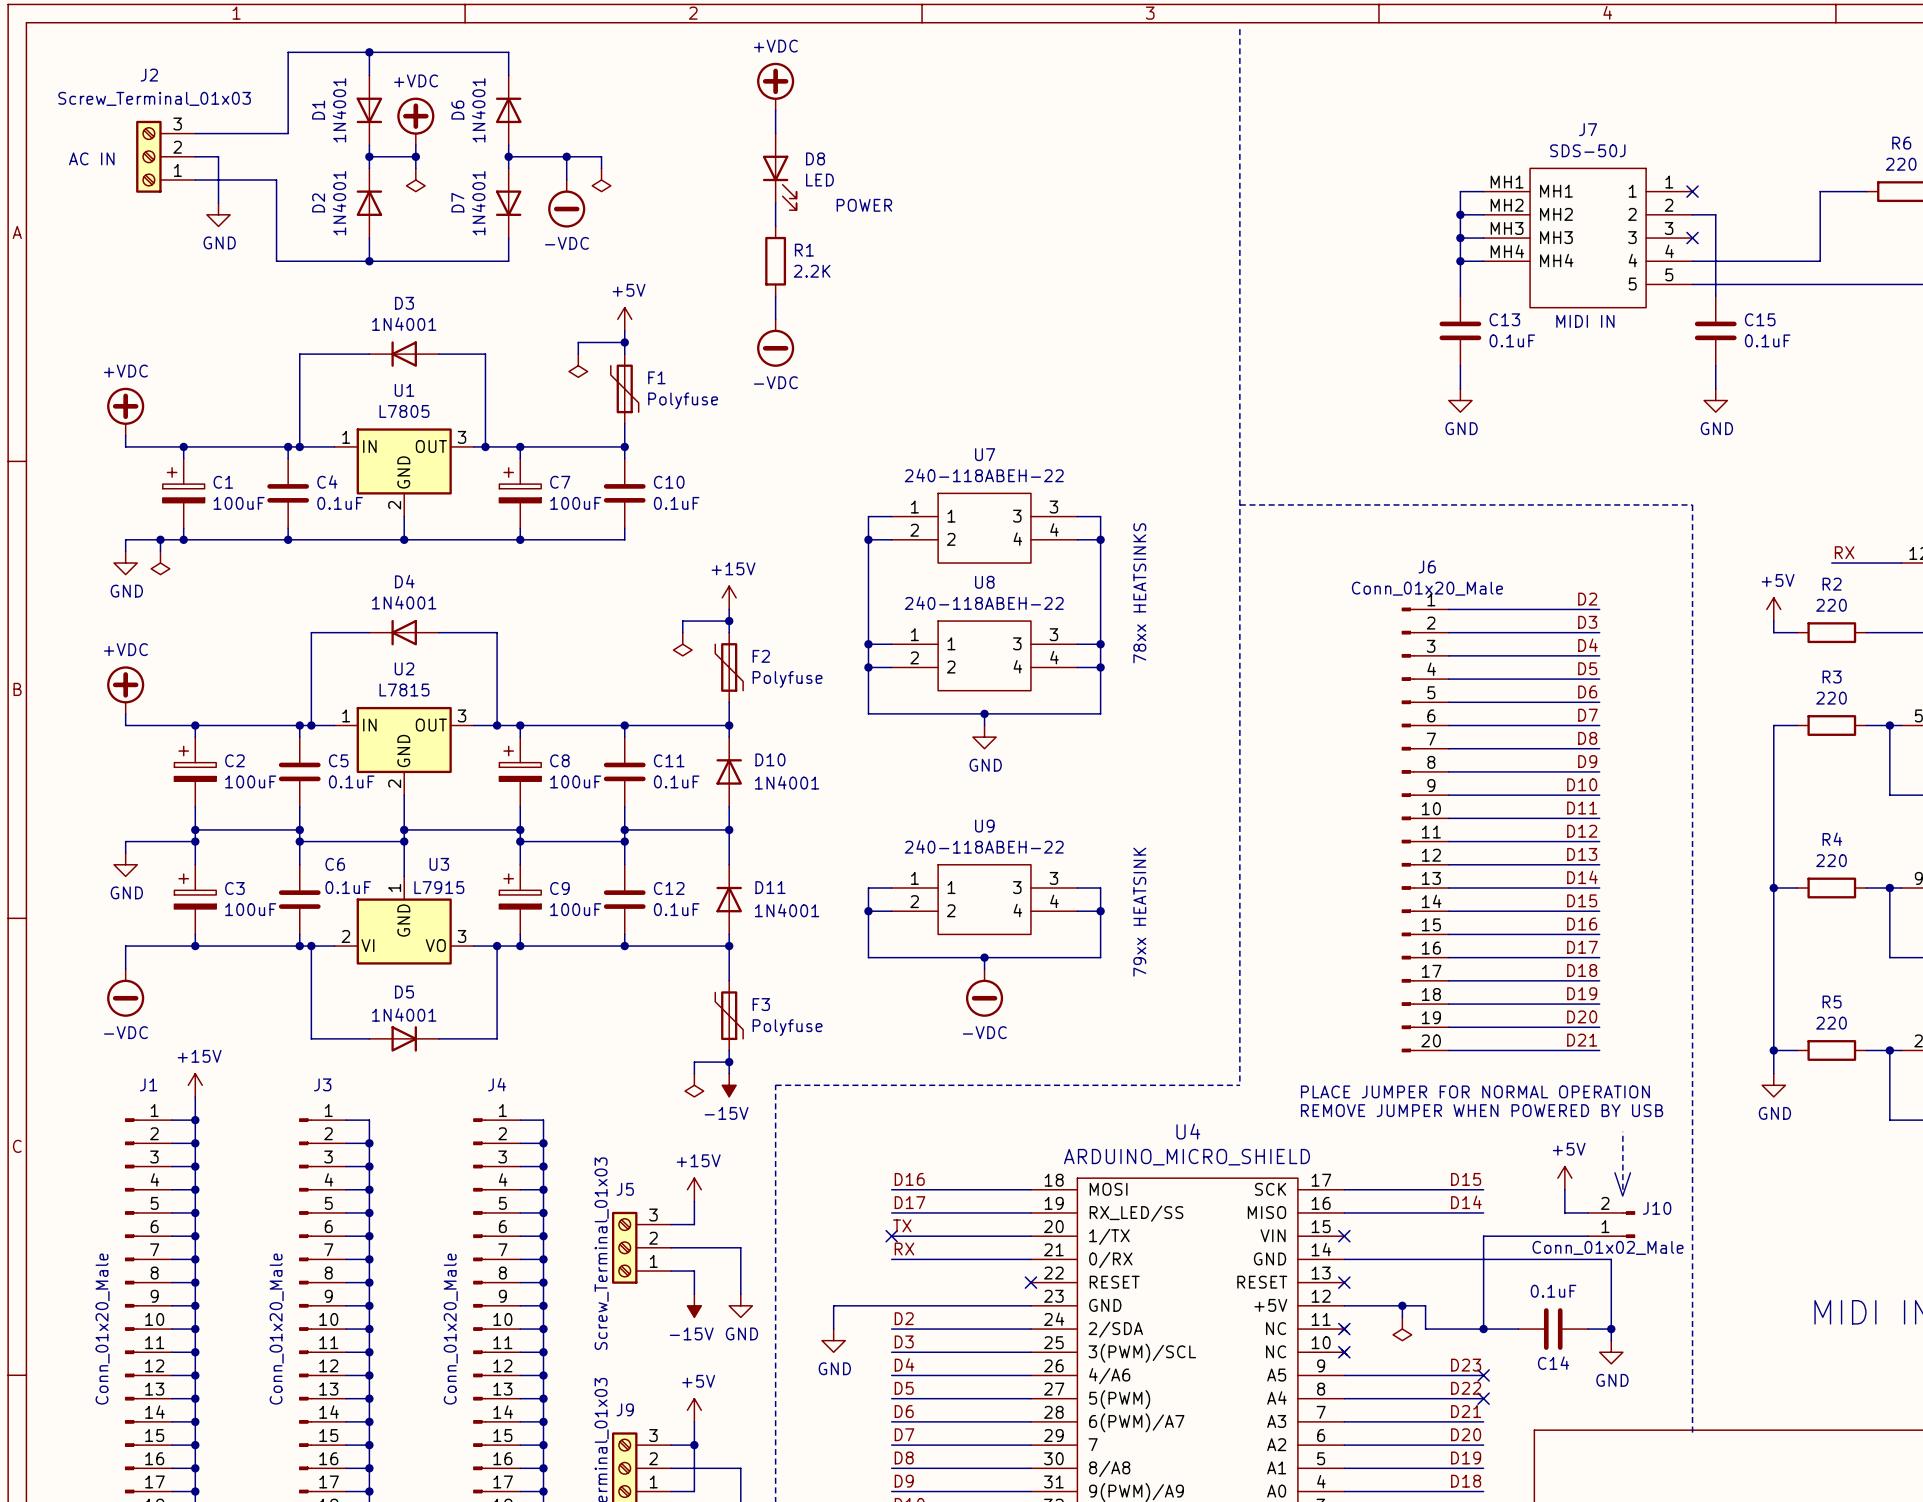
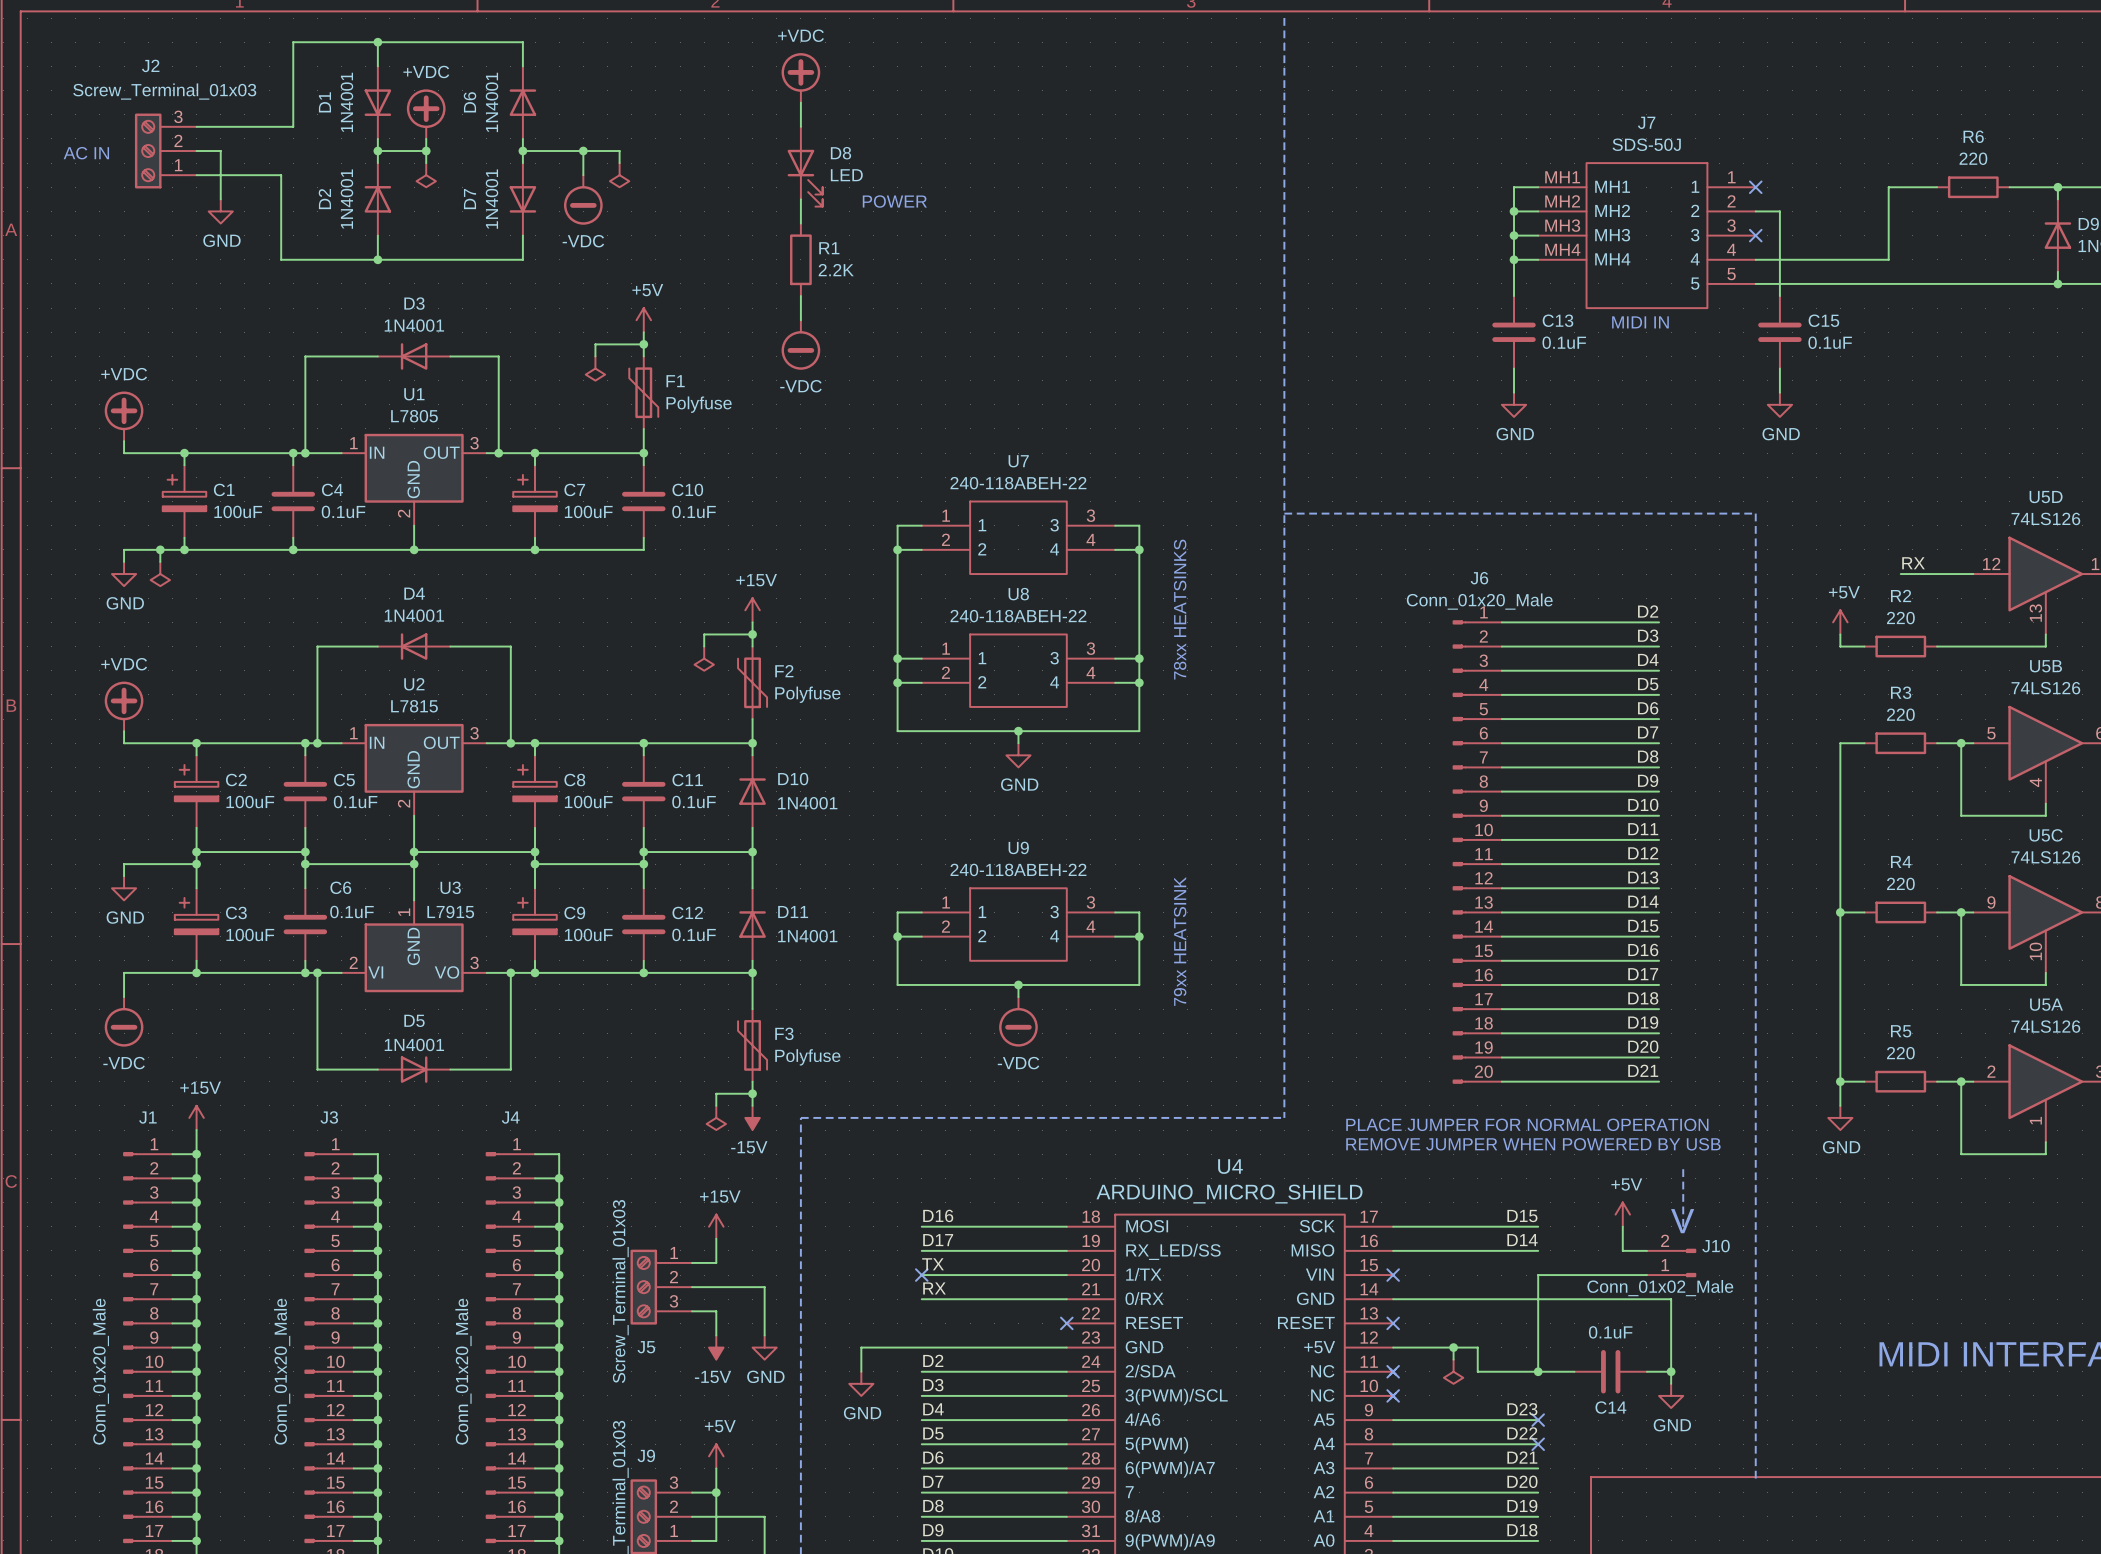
J5 flip: as is (624, 1247) -> up-down (643, 1287)

